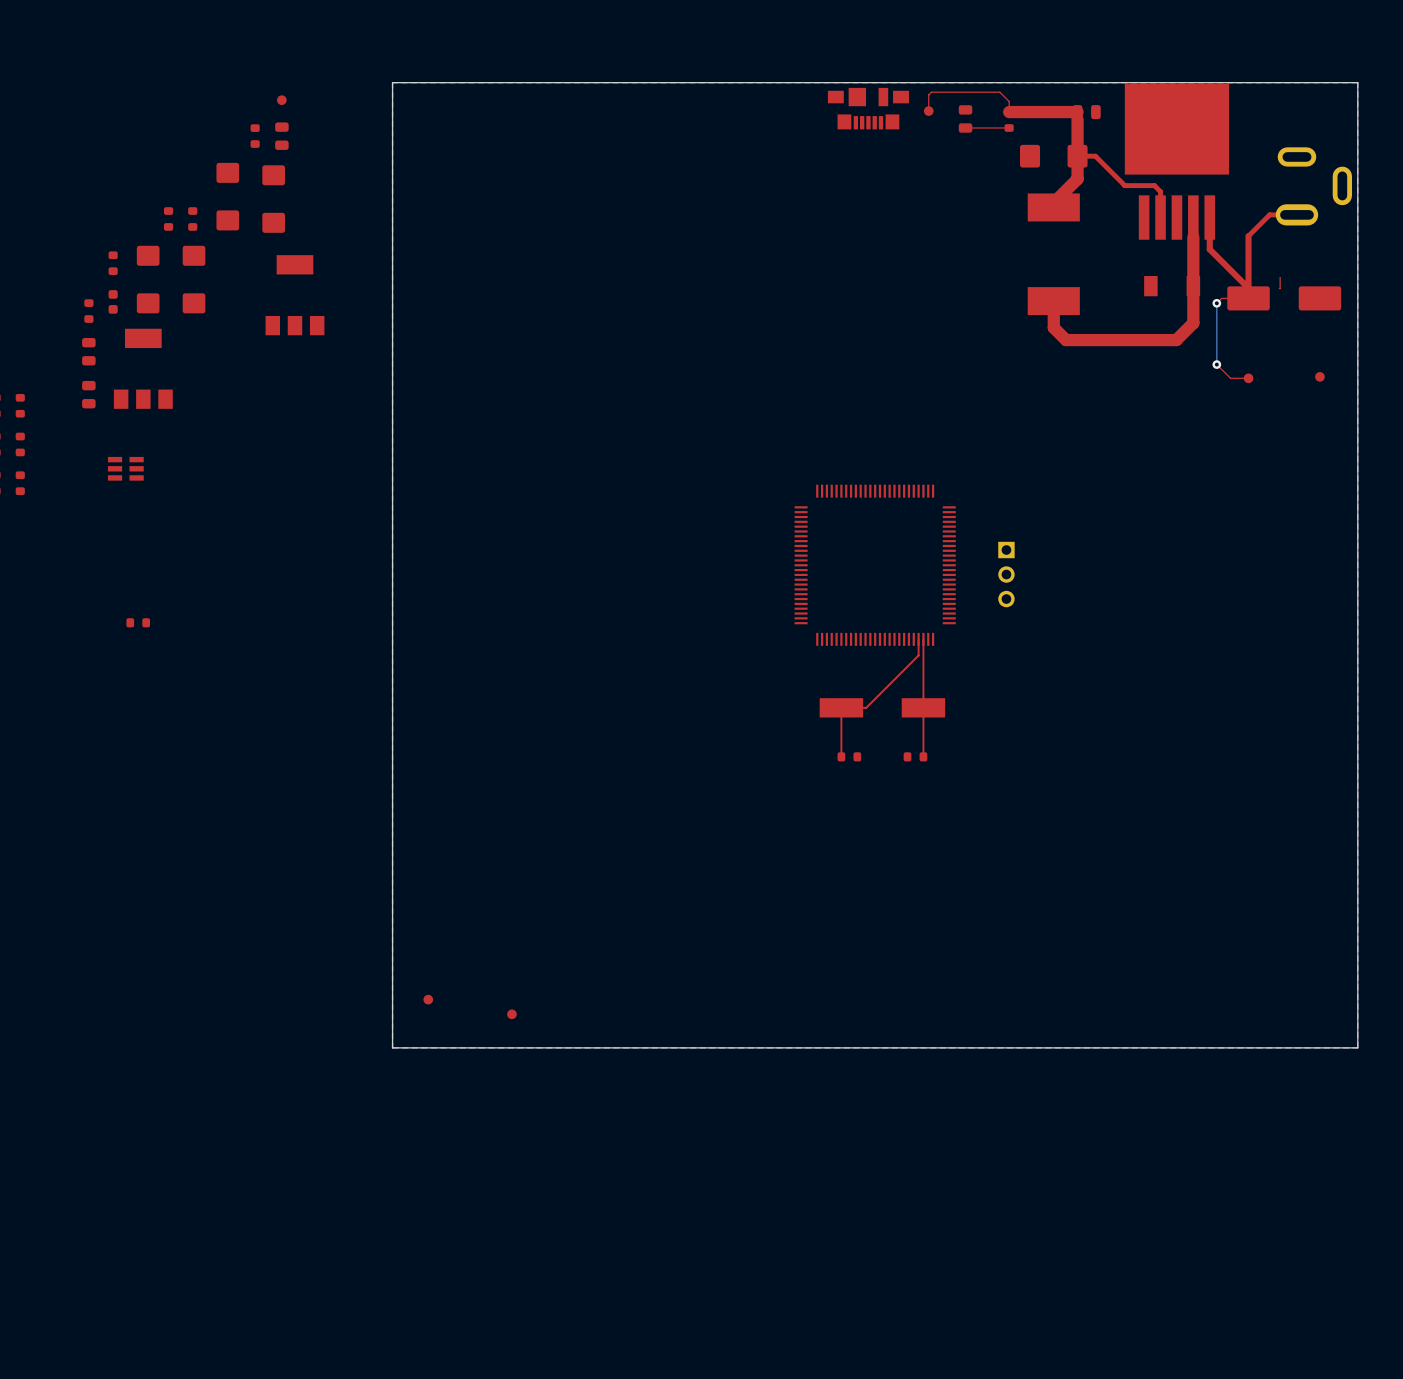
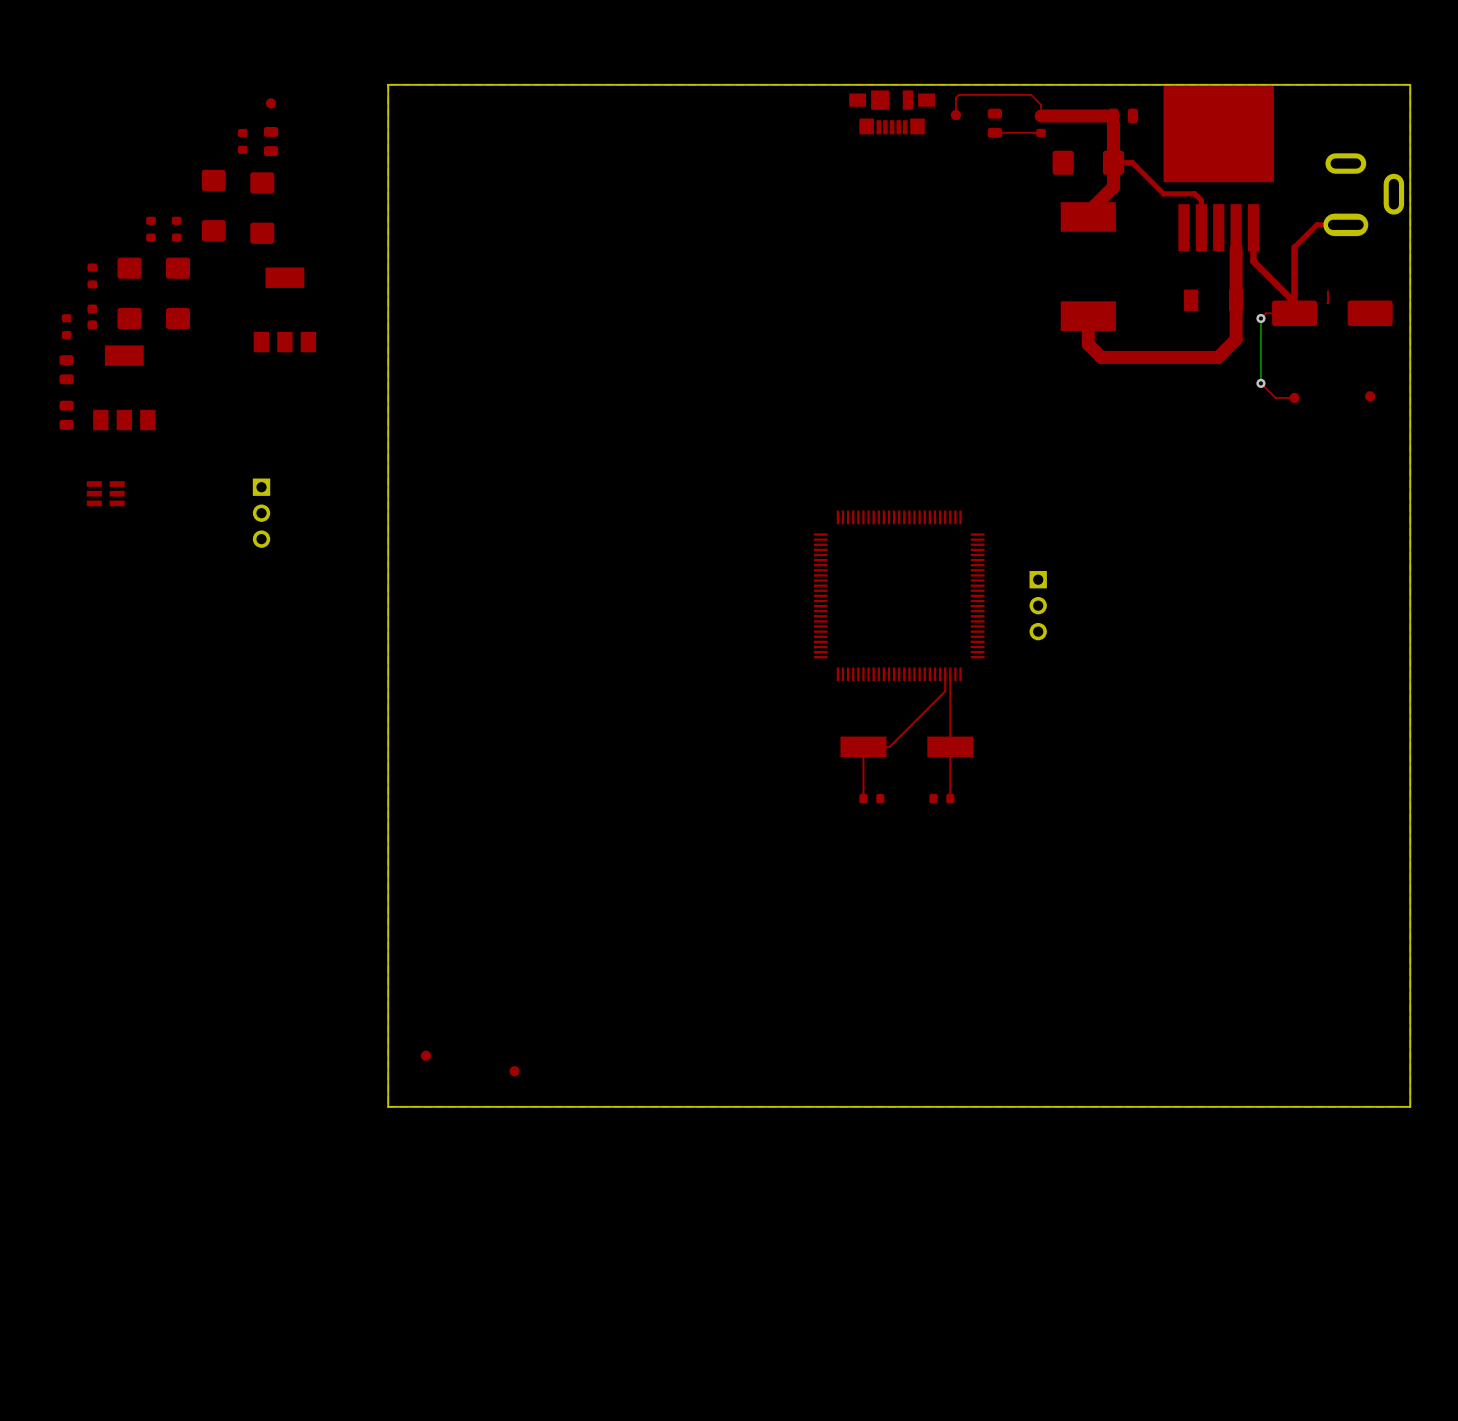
part: none -> (261, 513)
part: (138, 622) -> none

